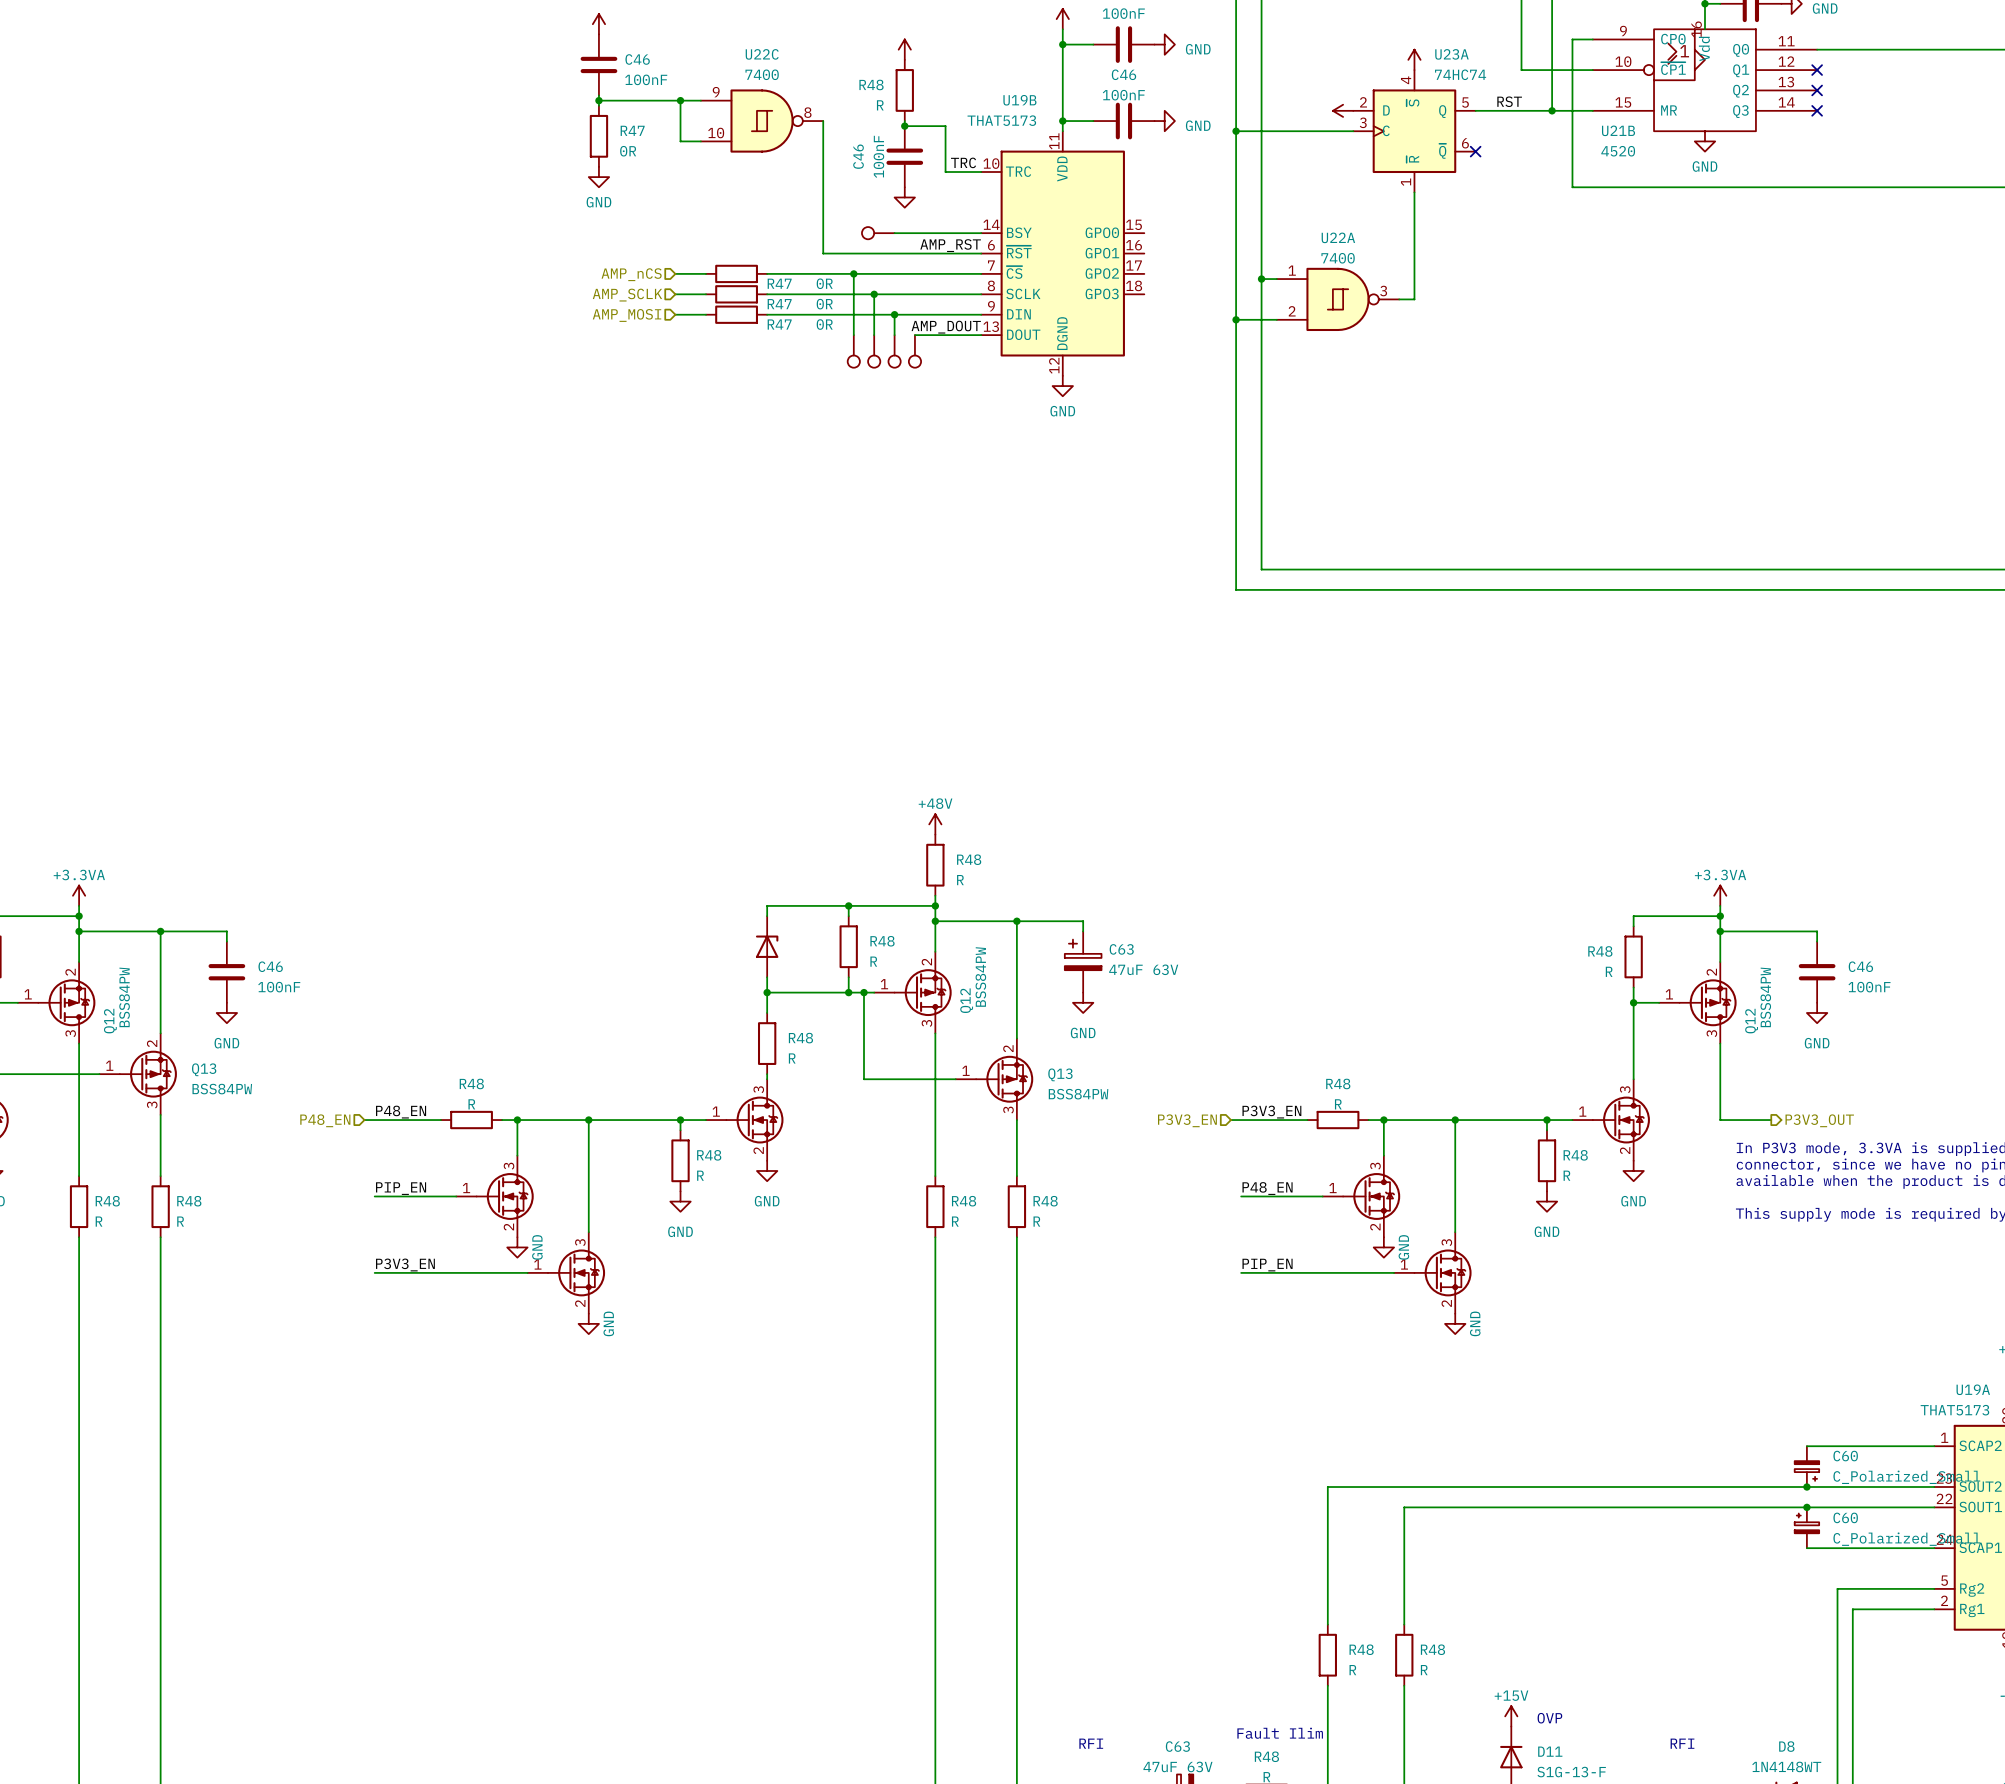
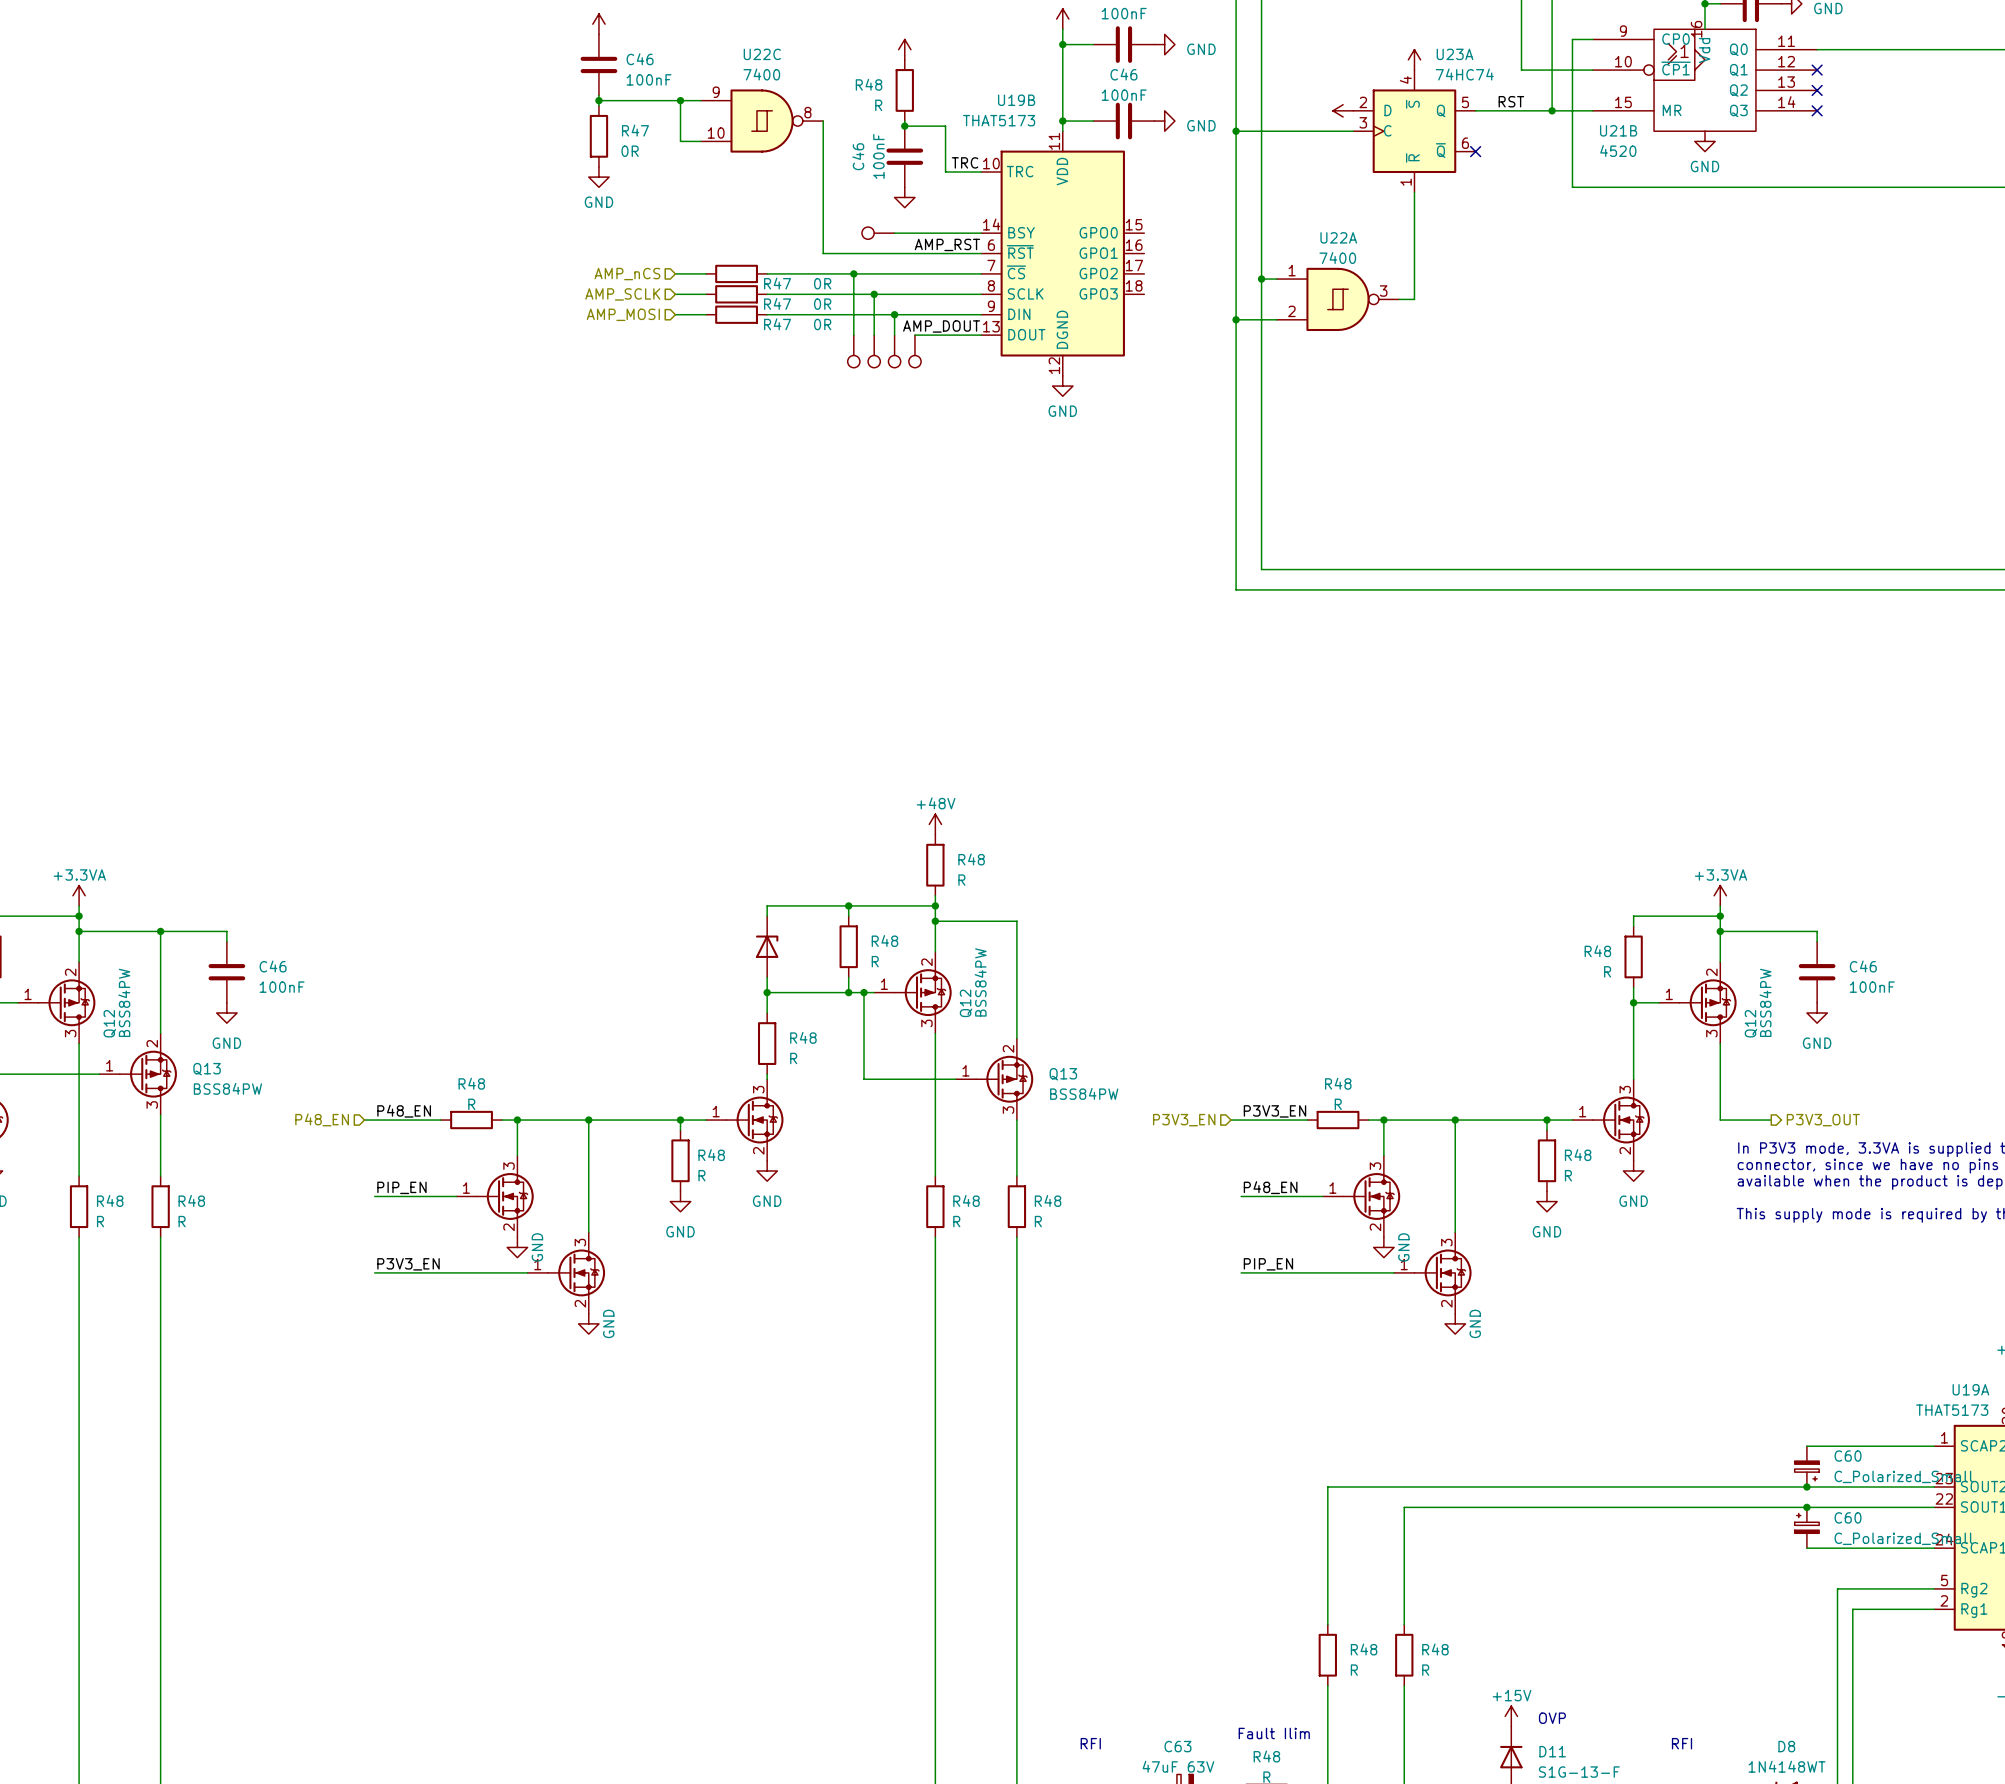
wire: (1016, 921) (1083, 921) (1083, 931) -> none
junction: (1016, 921) -> none
C63: 47uF 63V (1083, 962) -> none
power symbol: GND (1083, 1002) -> none

